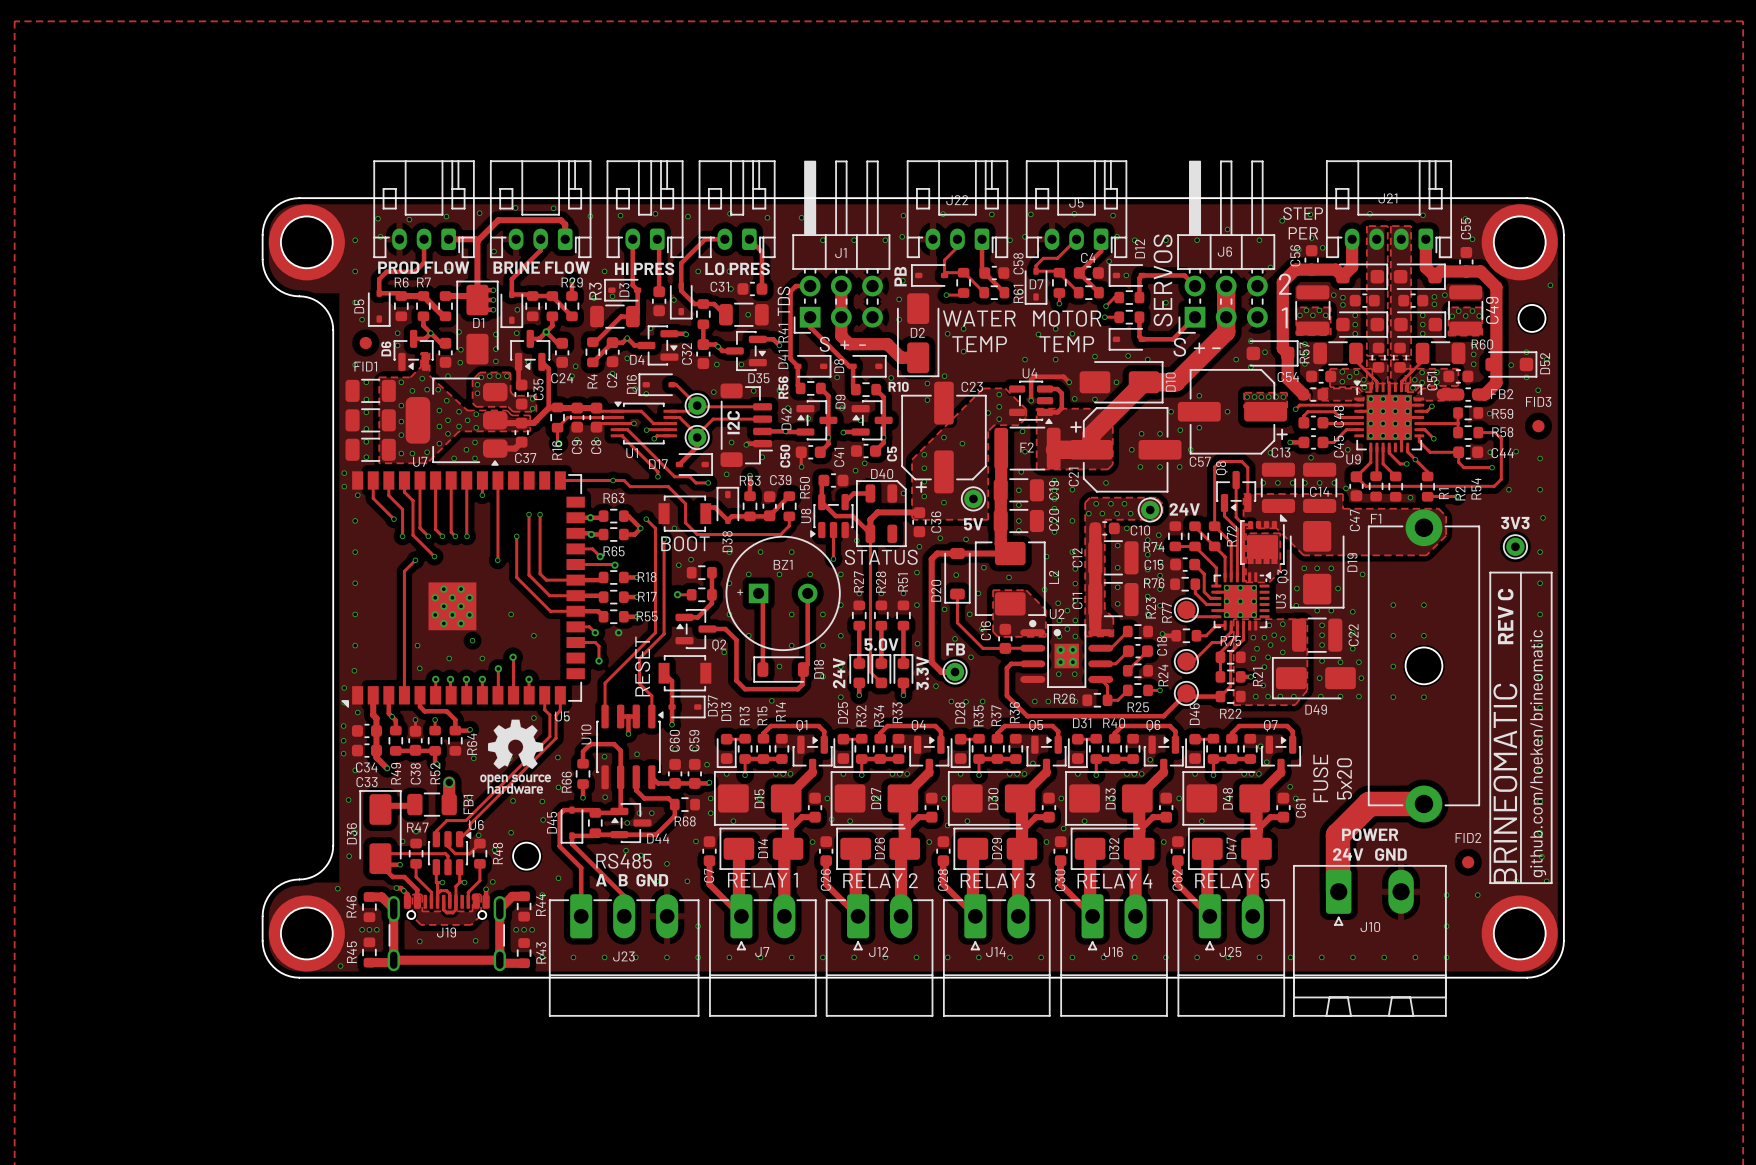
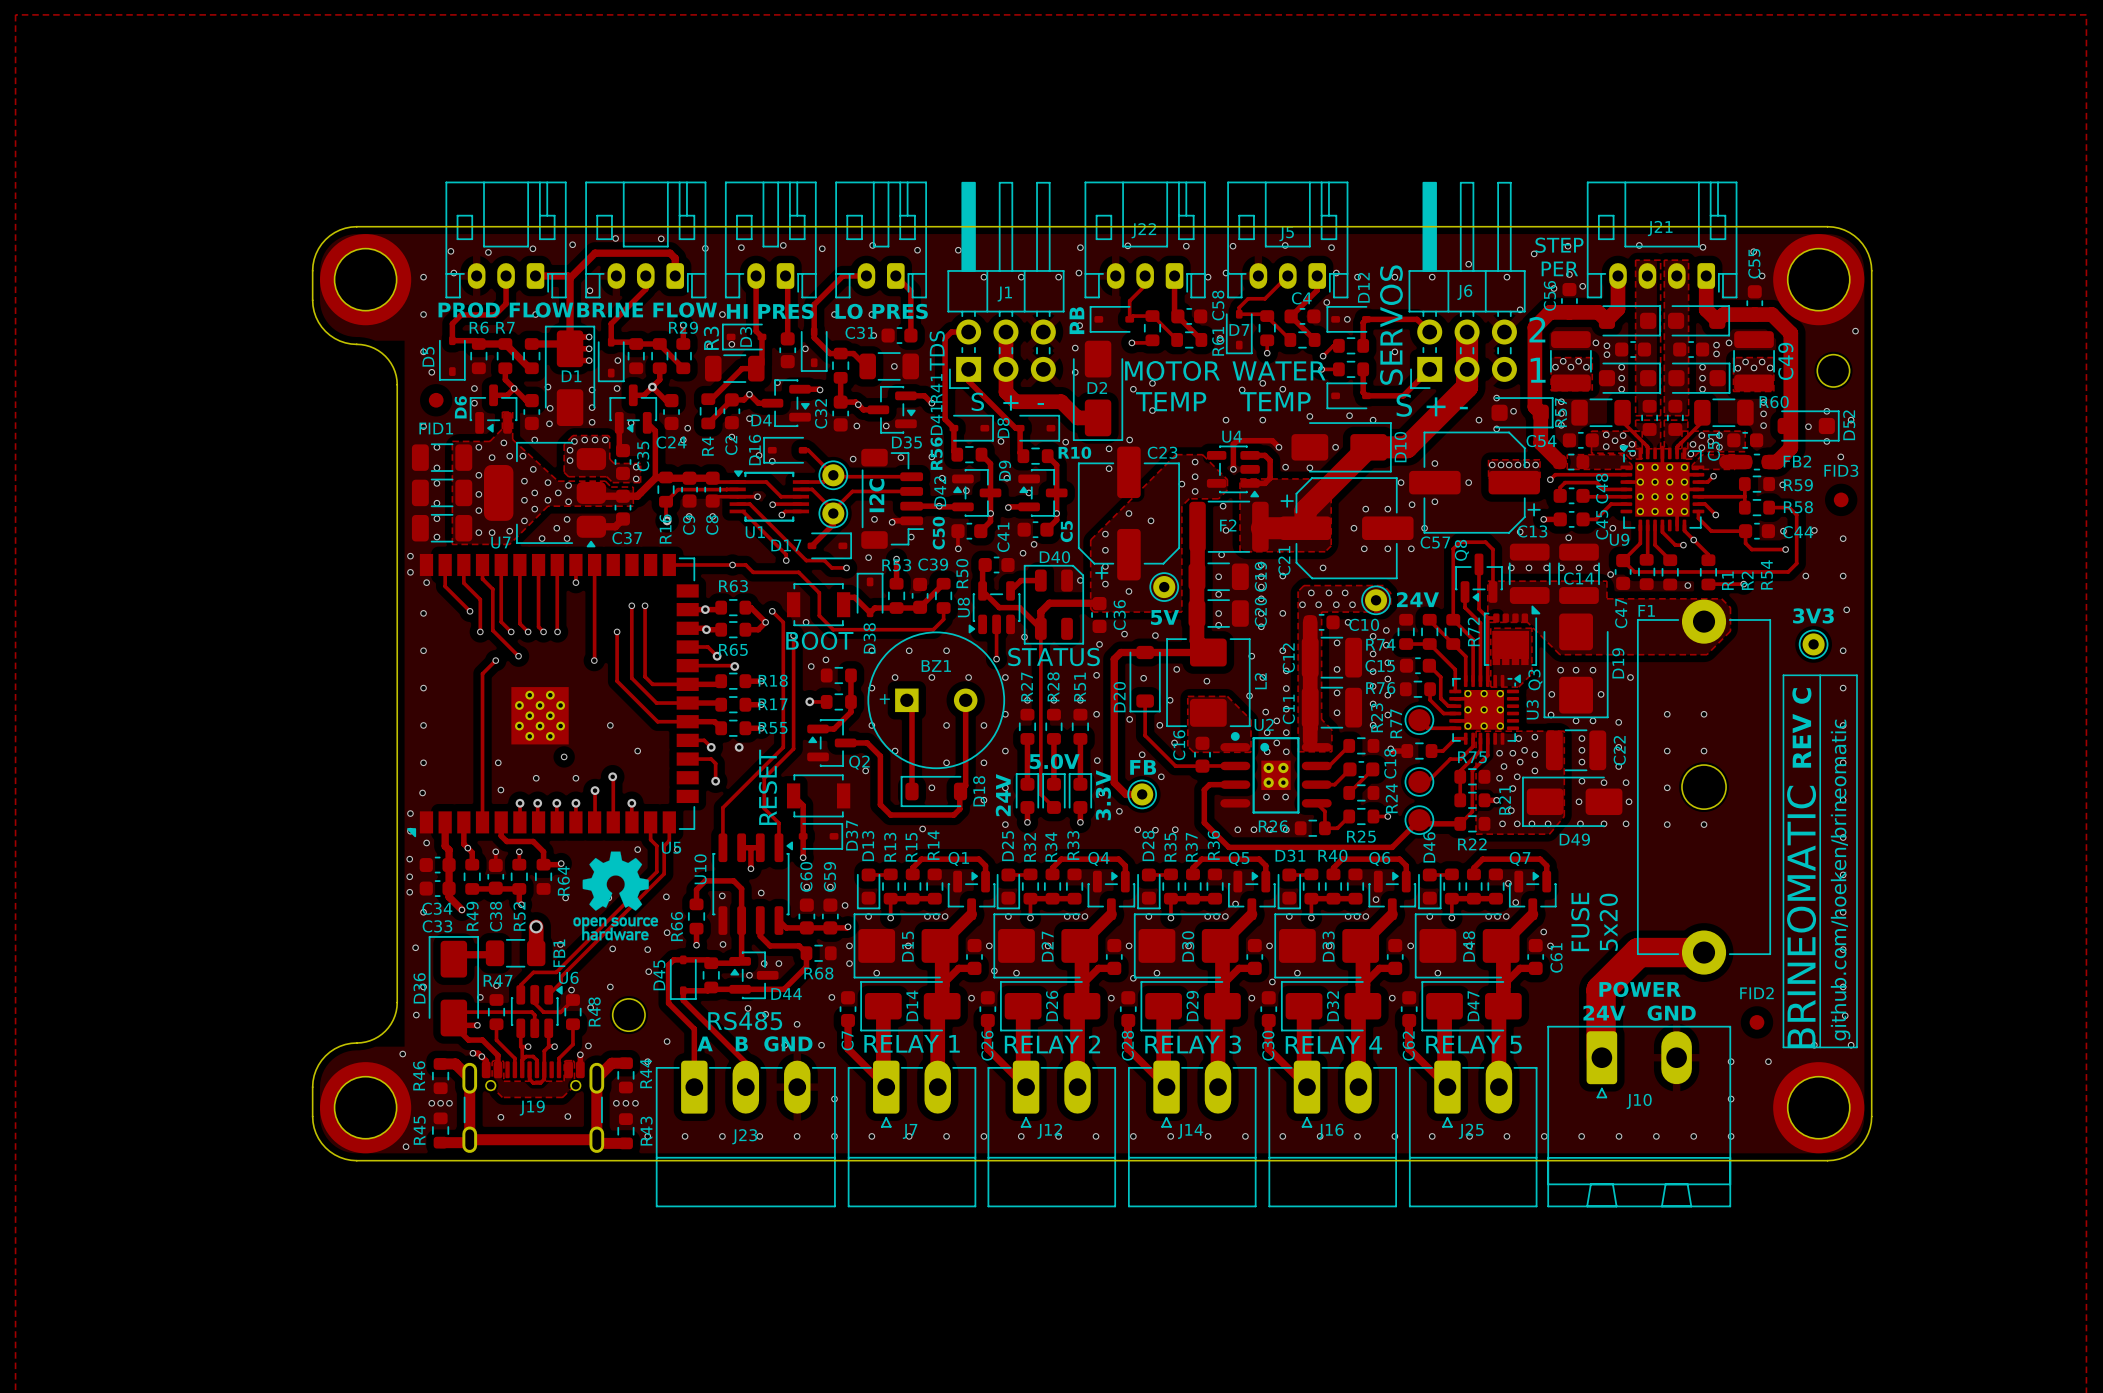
text: WATER (979, 318) -> MOTOR (1172, 370)
text: MOTOR (1067, 318) -> WATER (1279, 370)

